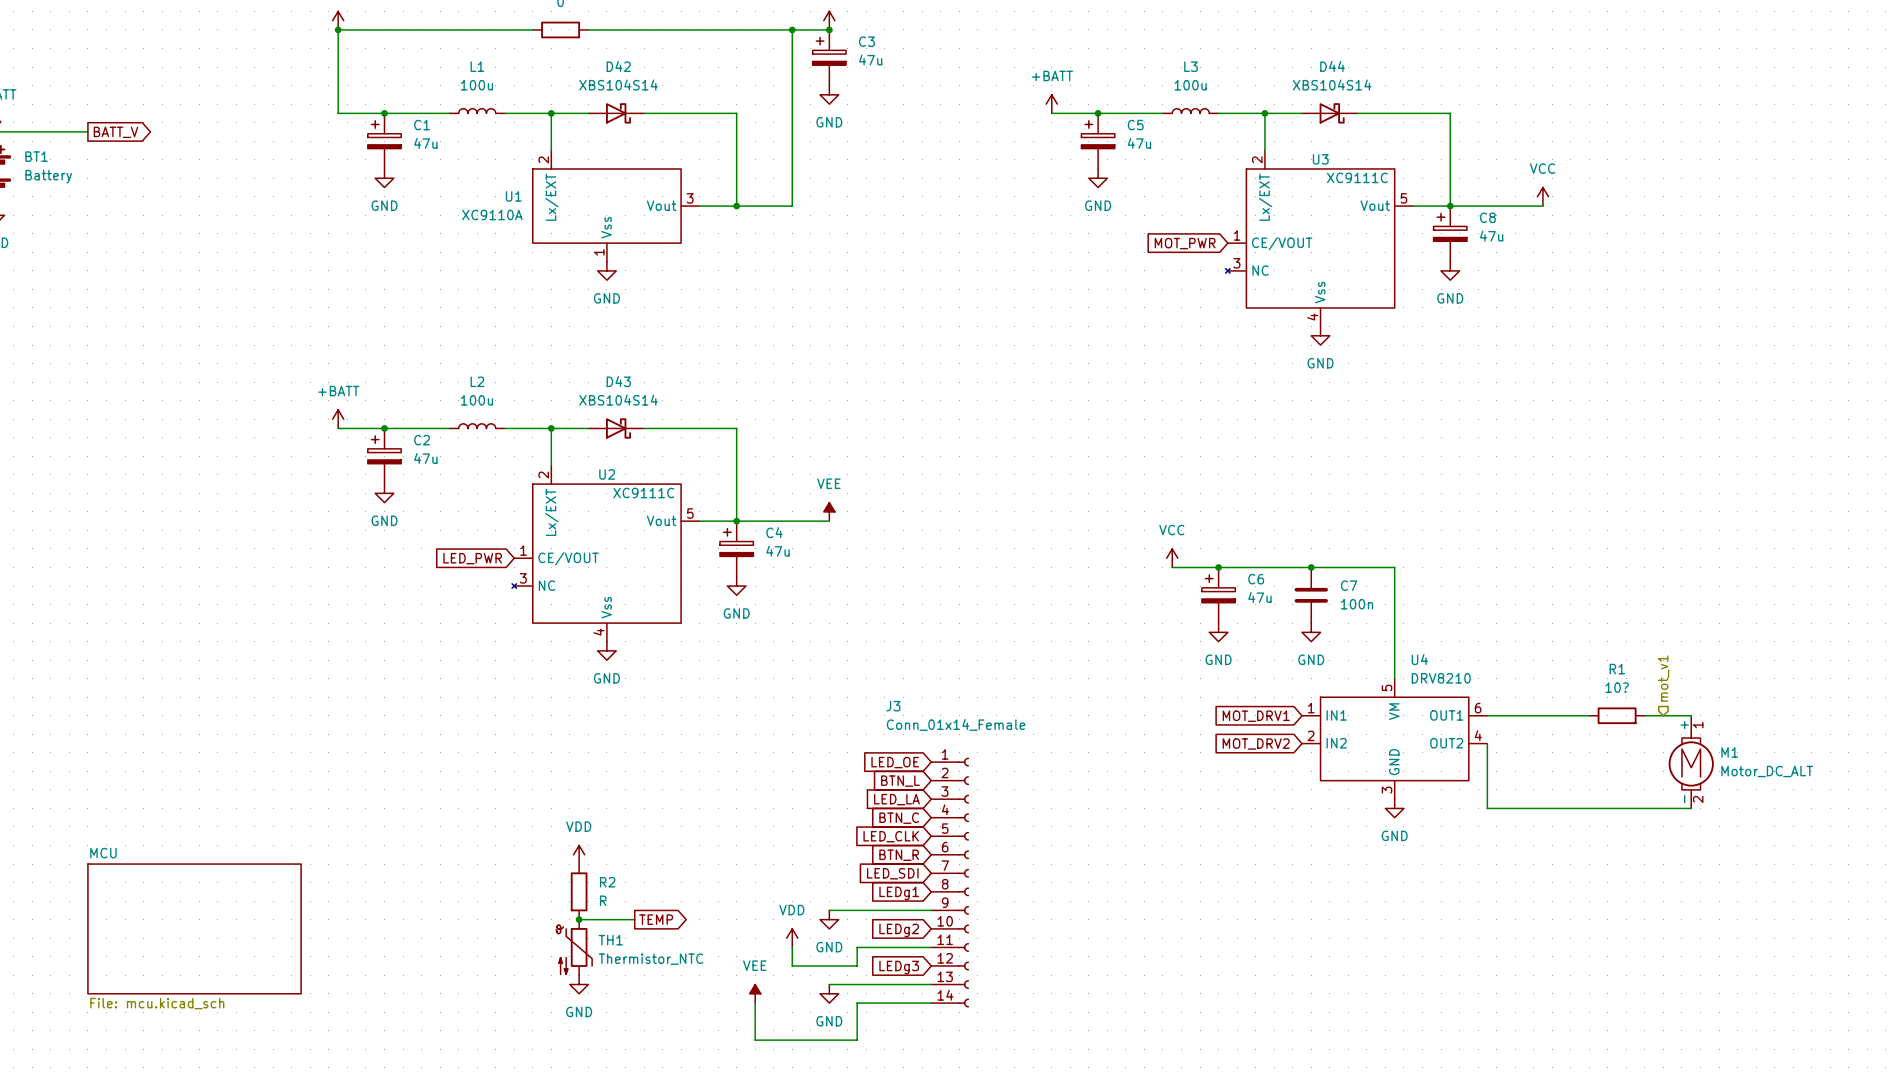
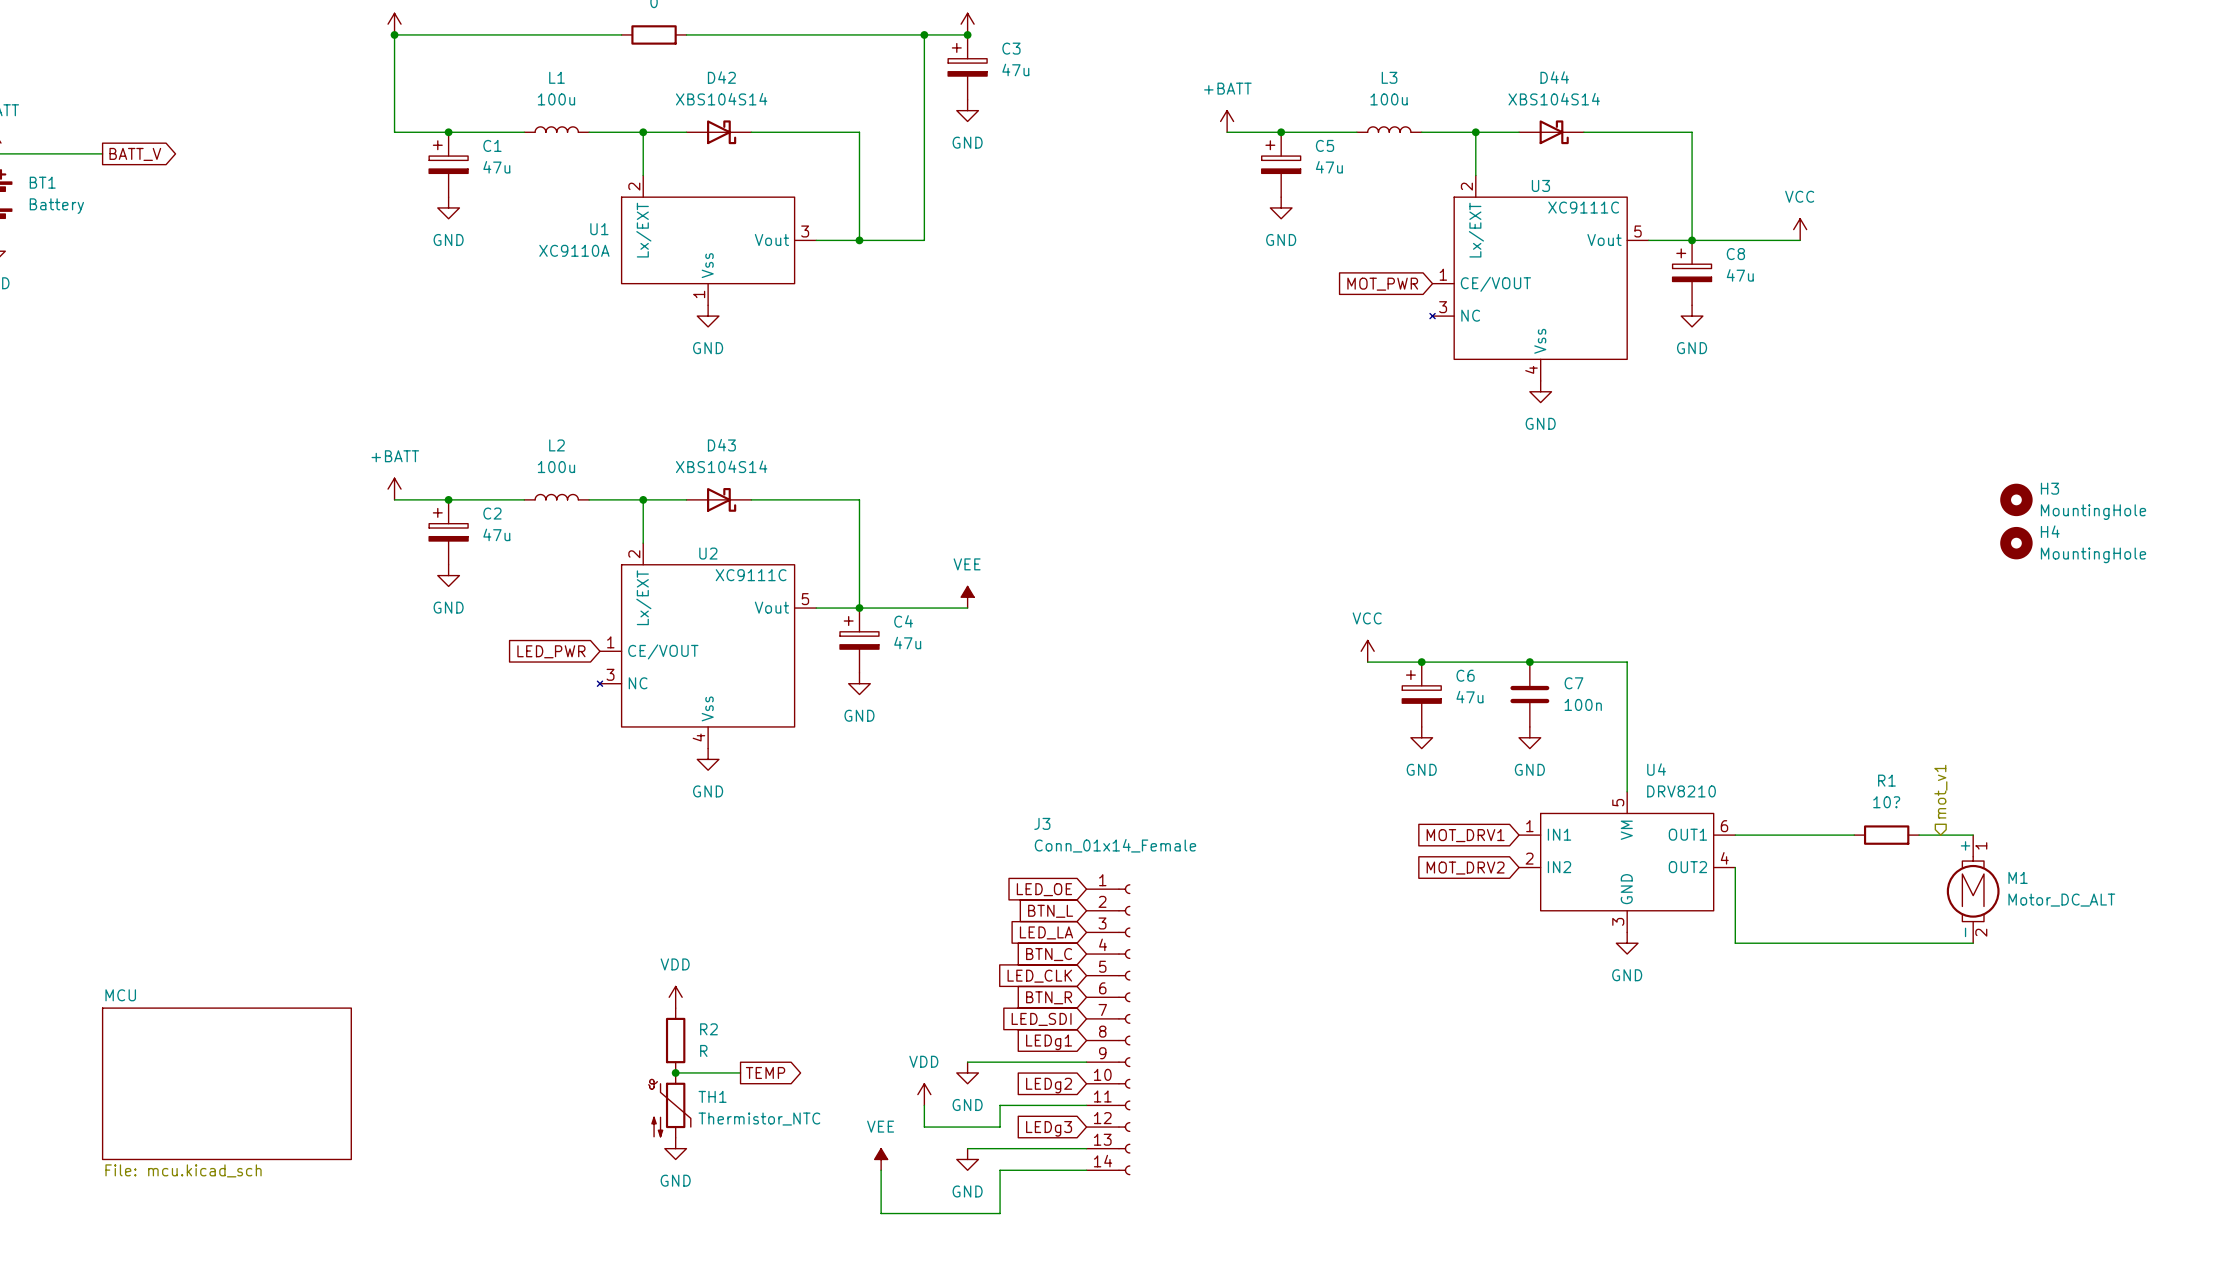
H3: none -> MountingHole (2016, 499)
H4: none -> MountingHole (2016, 543)

